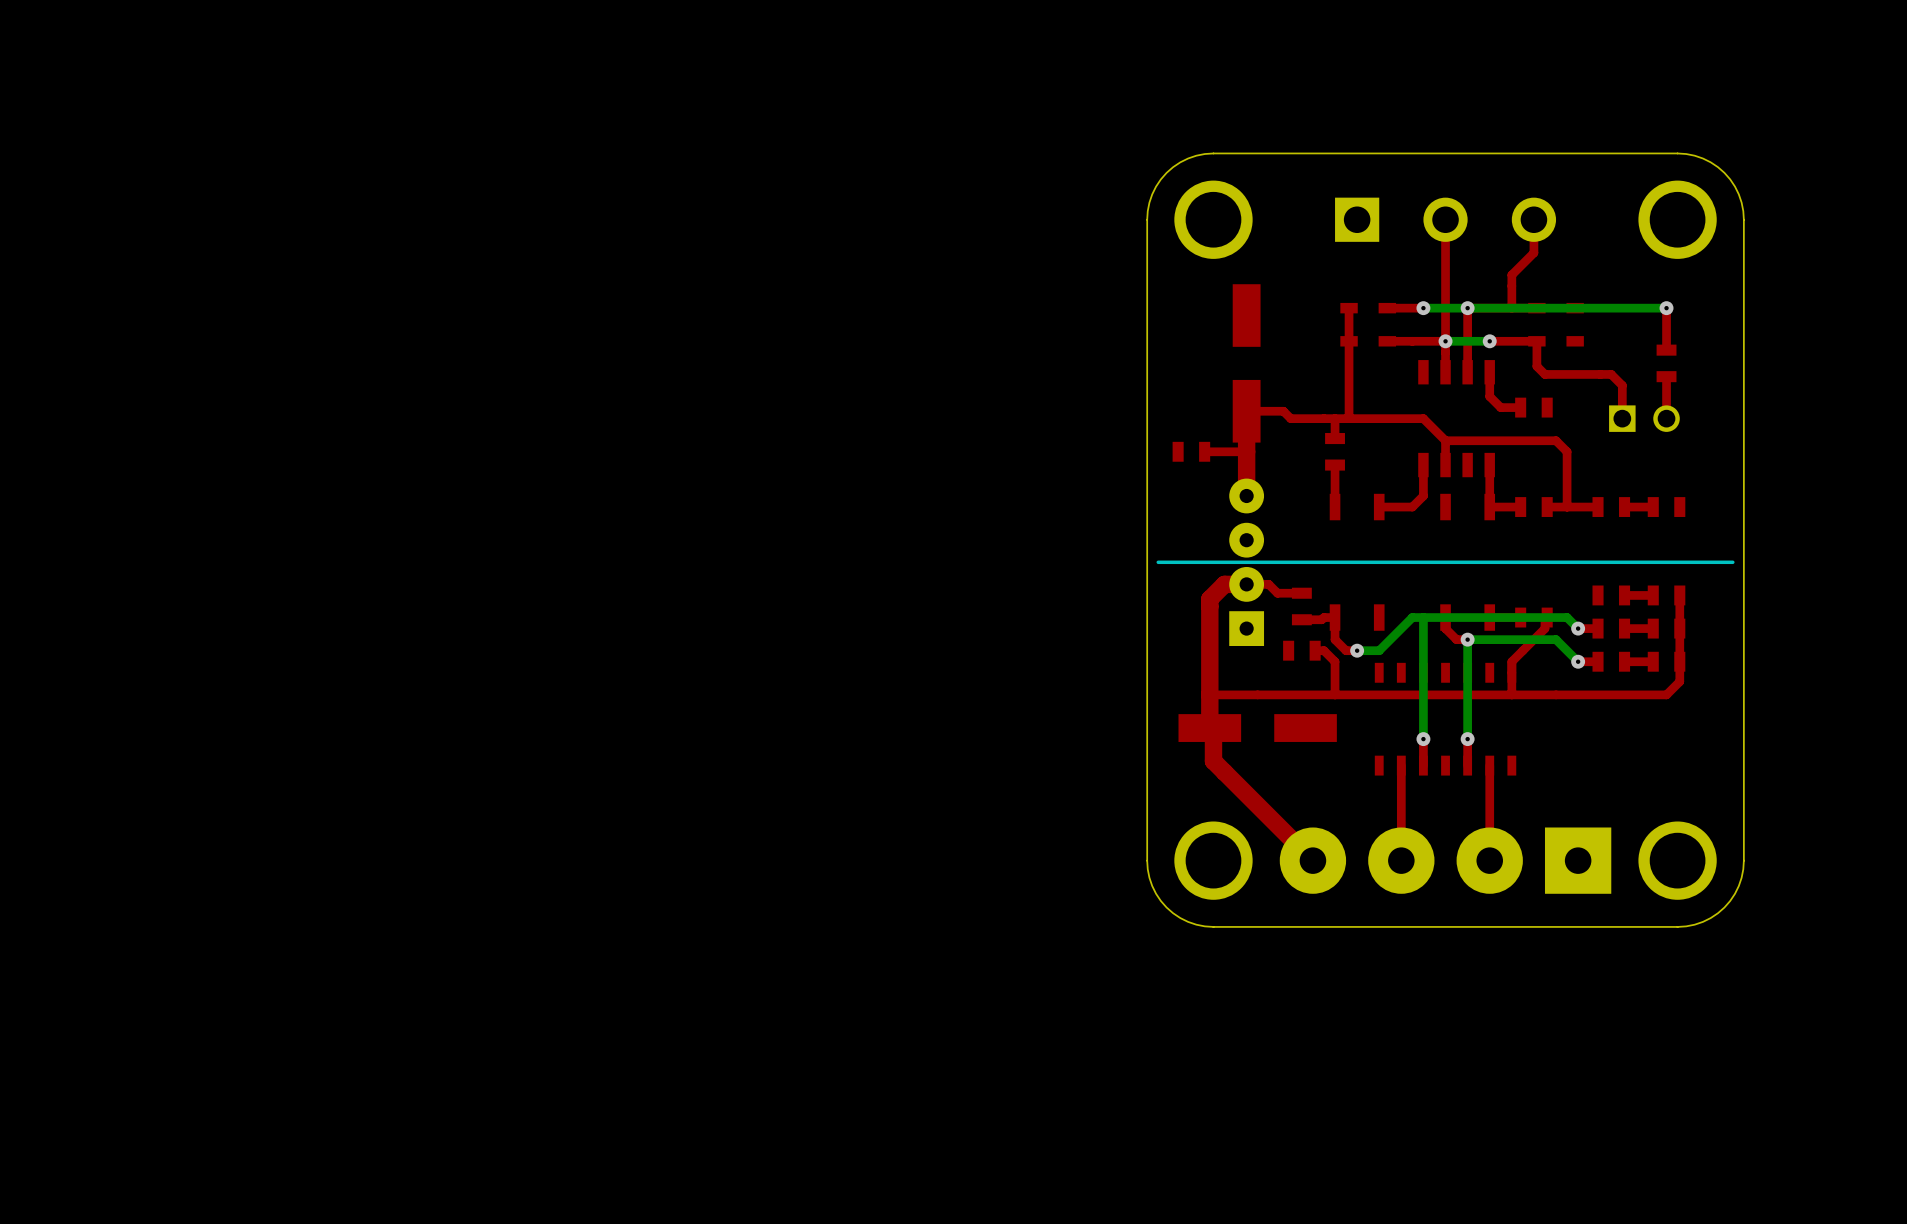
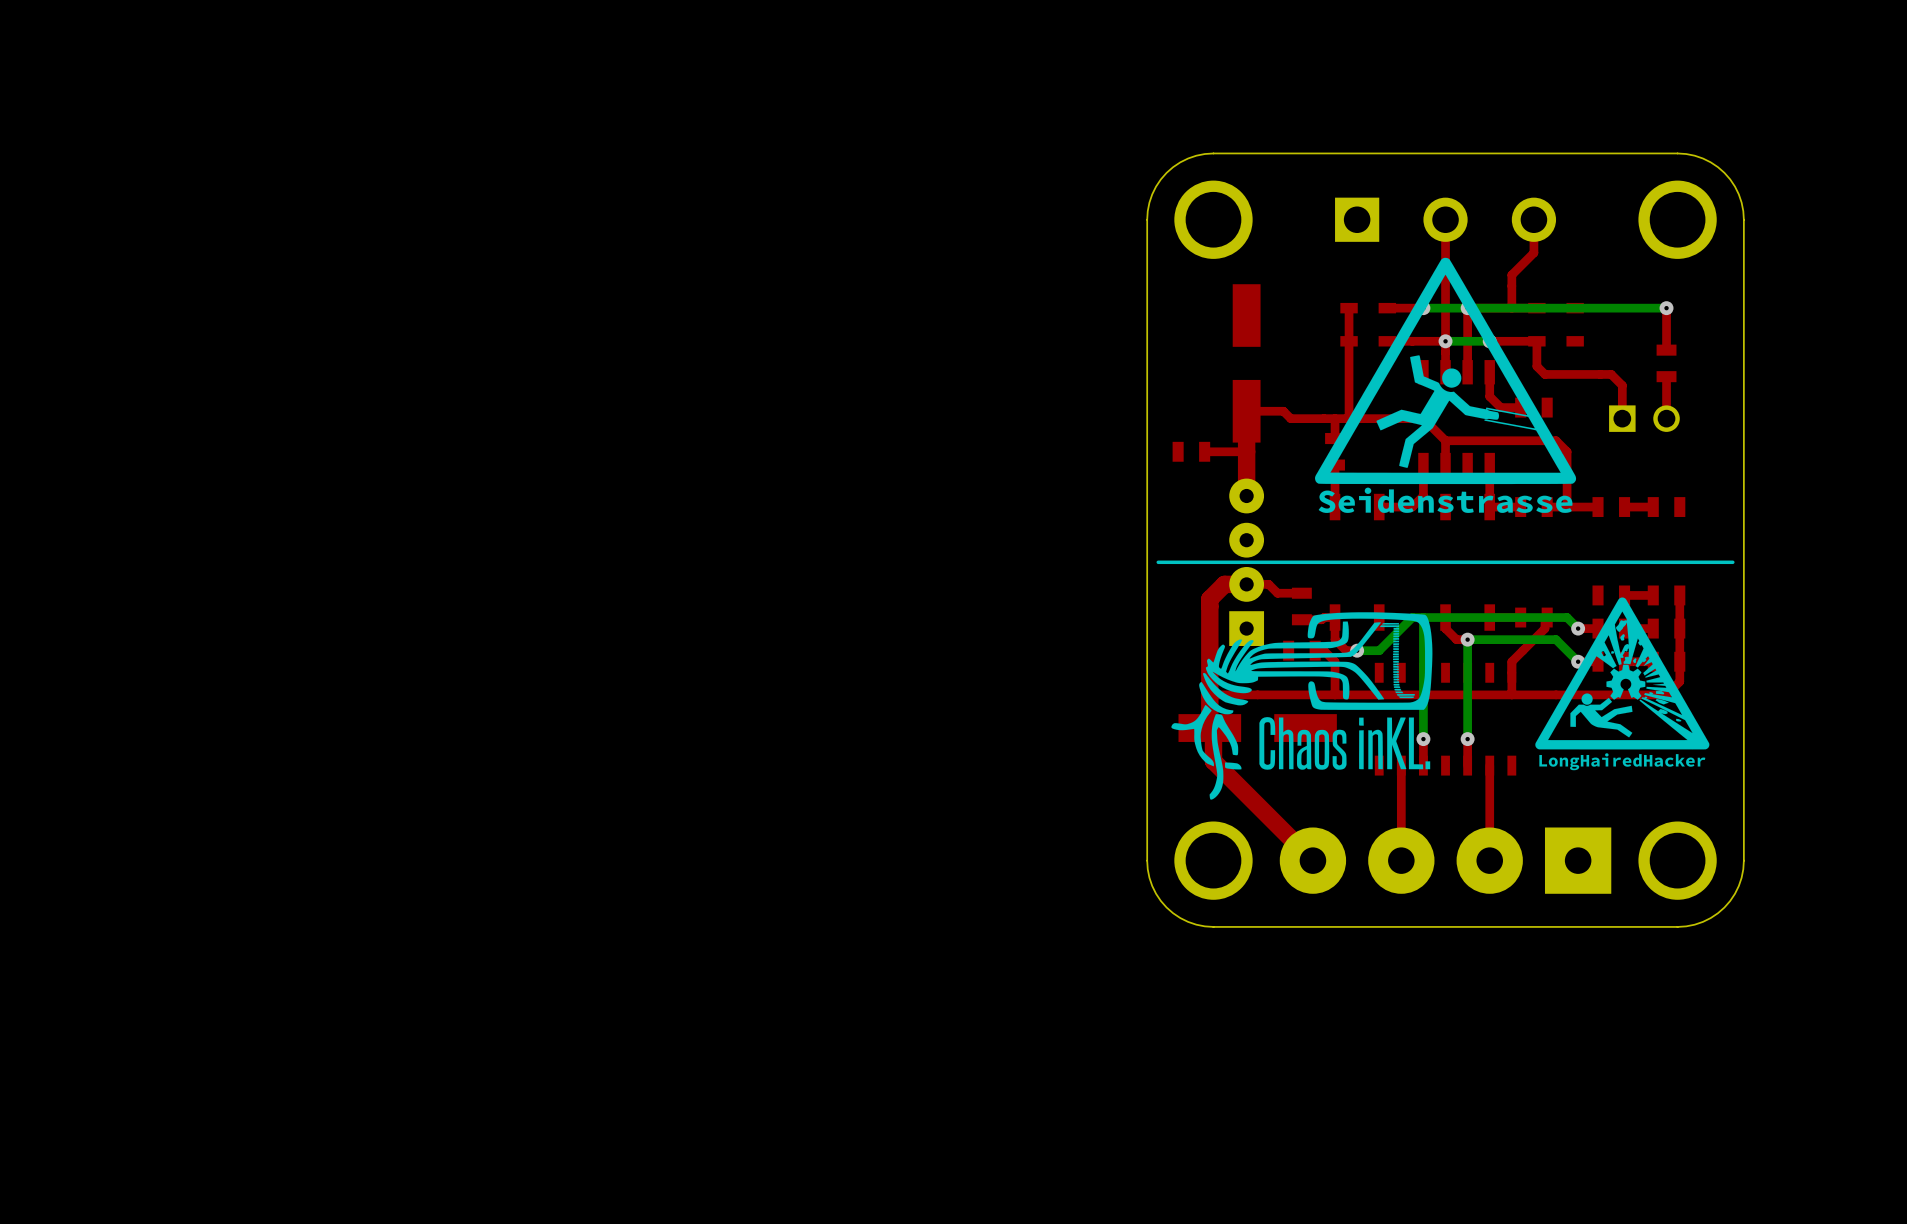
drawing: none -> [1314, 257, 1577, 513]
drawing: none -> [1535, 597, 1710, 771]
drawing: none -> [1171, 612, 1433, 800]

